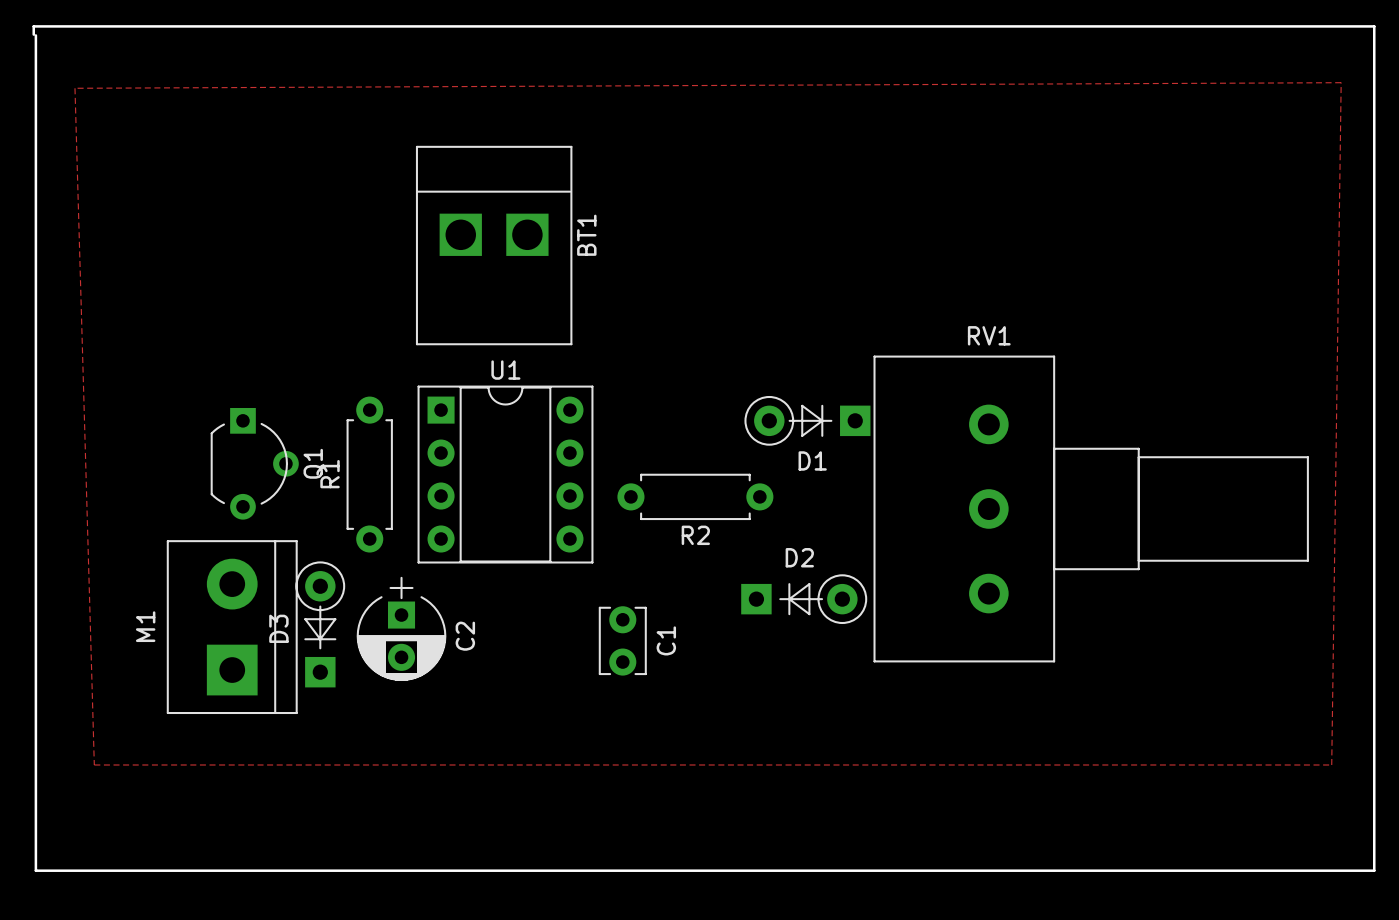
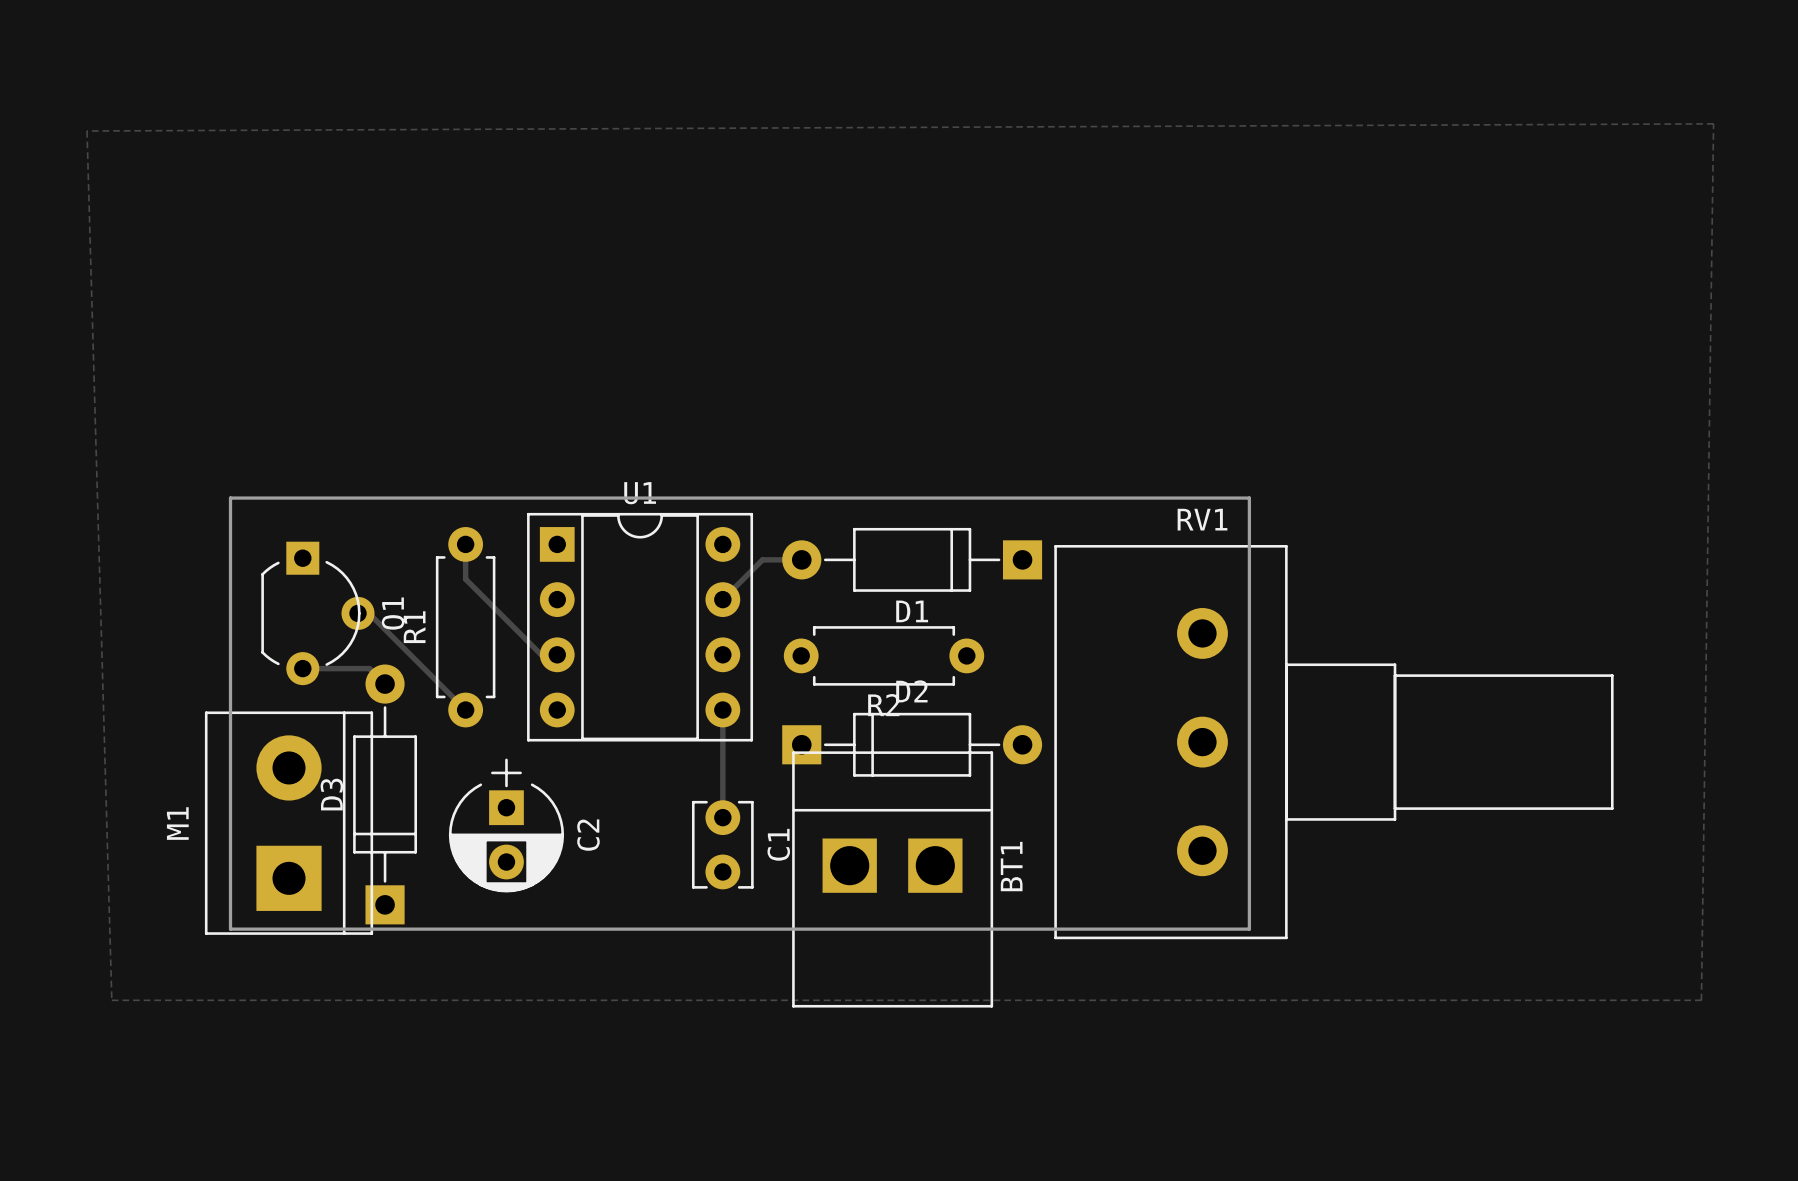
board edge: (33, 34) (33, 26) (1374, 26) (1374, 870) (35, 870) (35, 35) -> none
BT1 position: (494, 245) -> (892, 879)
RV1 footprint: [873, 355, 1309, 663] -> [1054, 545, 1614, 940]
board edge: none -> (230, 498) (230, 929) (1249, 929) (1249, 498) (230, 498)
D1 footprint: [744, 395, 871, 446] -> [782, 527, 1043, 592]
track: none -> (465, 544) (465, 579) (541, 654) (557, 654)
track: none -> (801, 559) (762, 559) (722, 599)
track: none -> (358, 613) (369, 613) (465, 710)
track: none -> (302, 668) (369, 668) (385, 684)
track: none -> (722, 710) (722, 817)
D3 footprint: [295, 561, 346, 688] -> [353, 664, 417, 925]
D2 footprint: [741, 574, 868, 625] -> [782, 712, 1043, 777]
C1 position: (622, 640) -> (722, 844)

